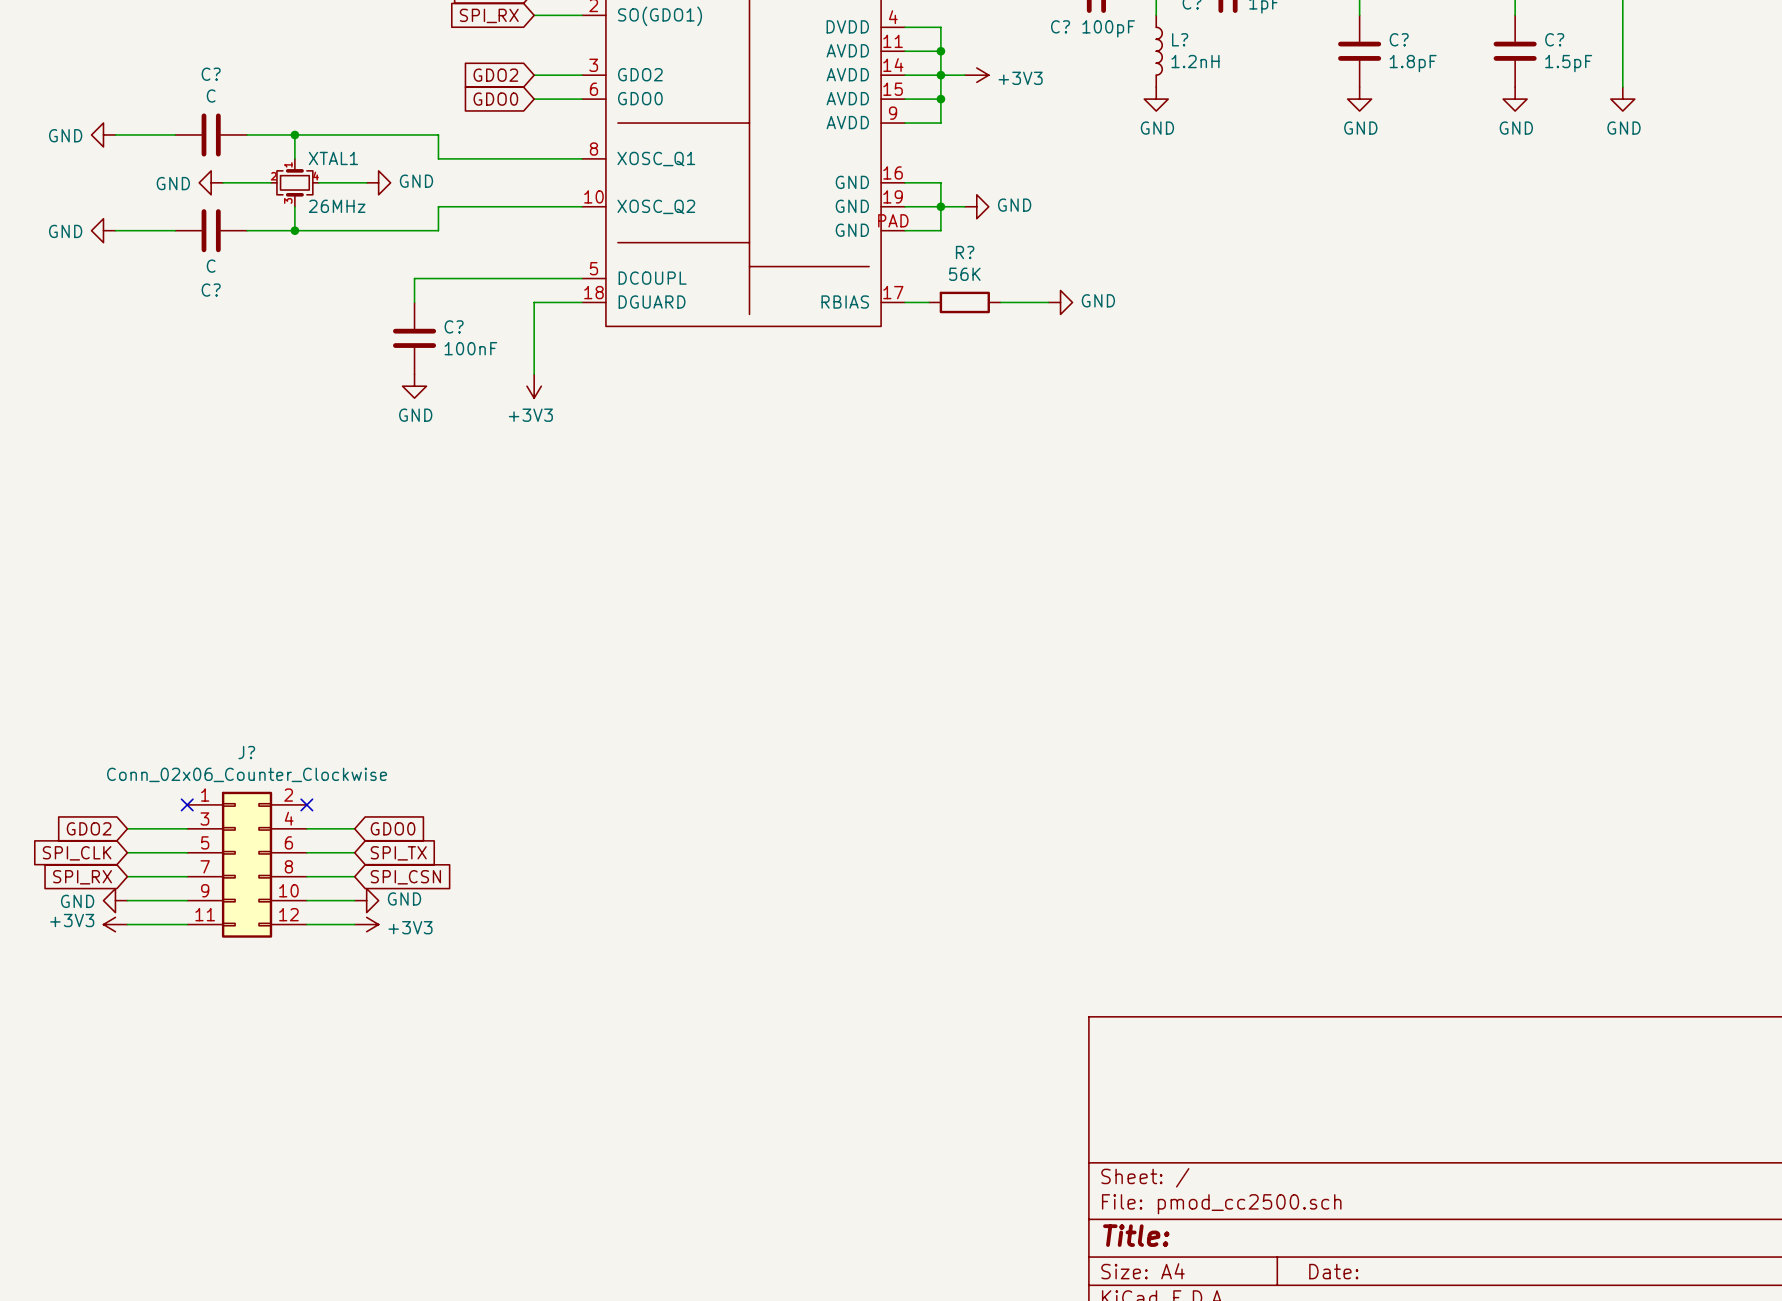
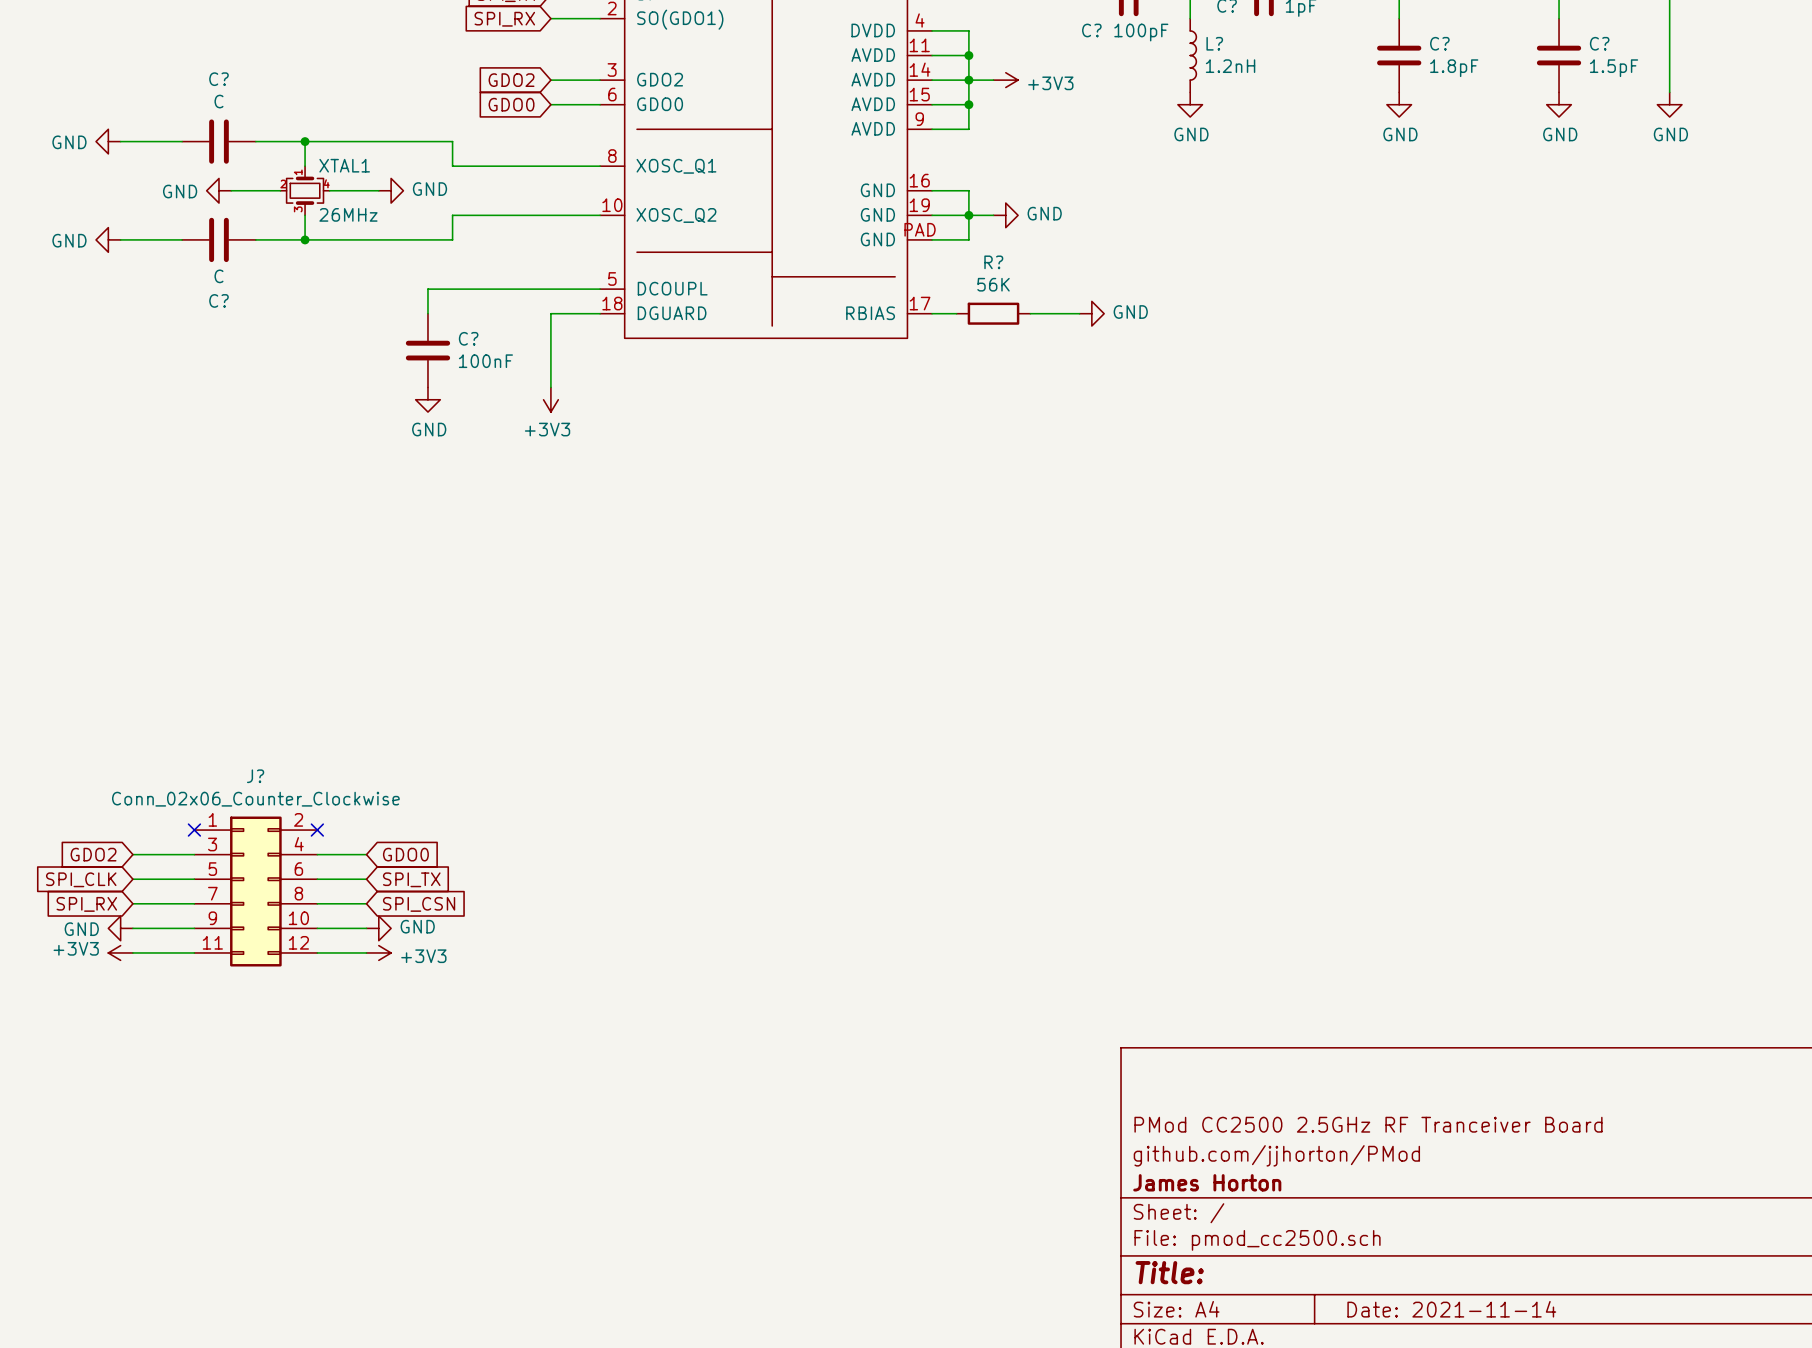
title block: none -> PMod CC2500 2.5GHz RF Tranceiver Board (1368, 1124)
title block: none -> github.com/jjhorton/PMod (1276, 1155)
title block: none -> James Horton (1207, 1182)
title block: Date: (1333, 1271) -> Date: 2021-11-14 (1451, 1309)

